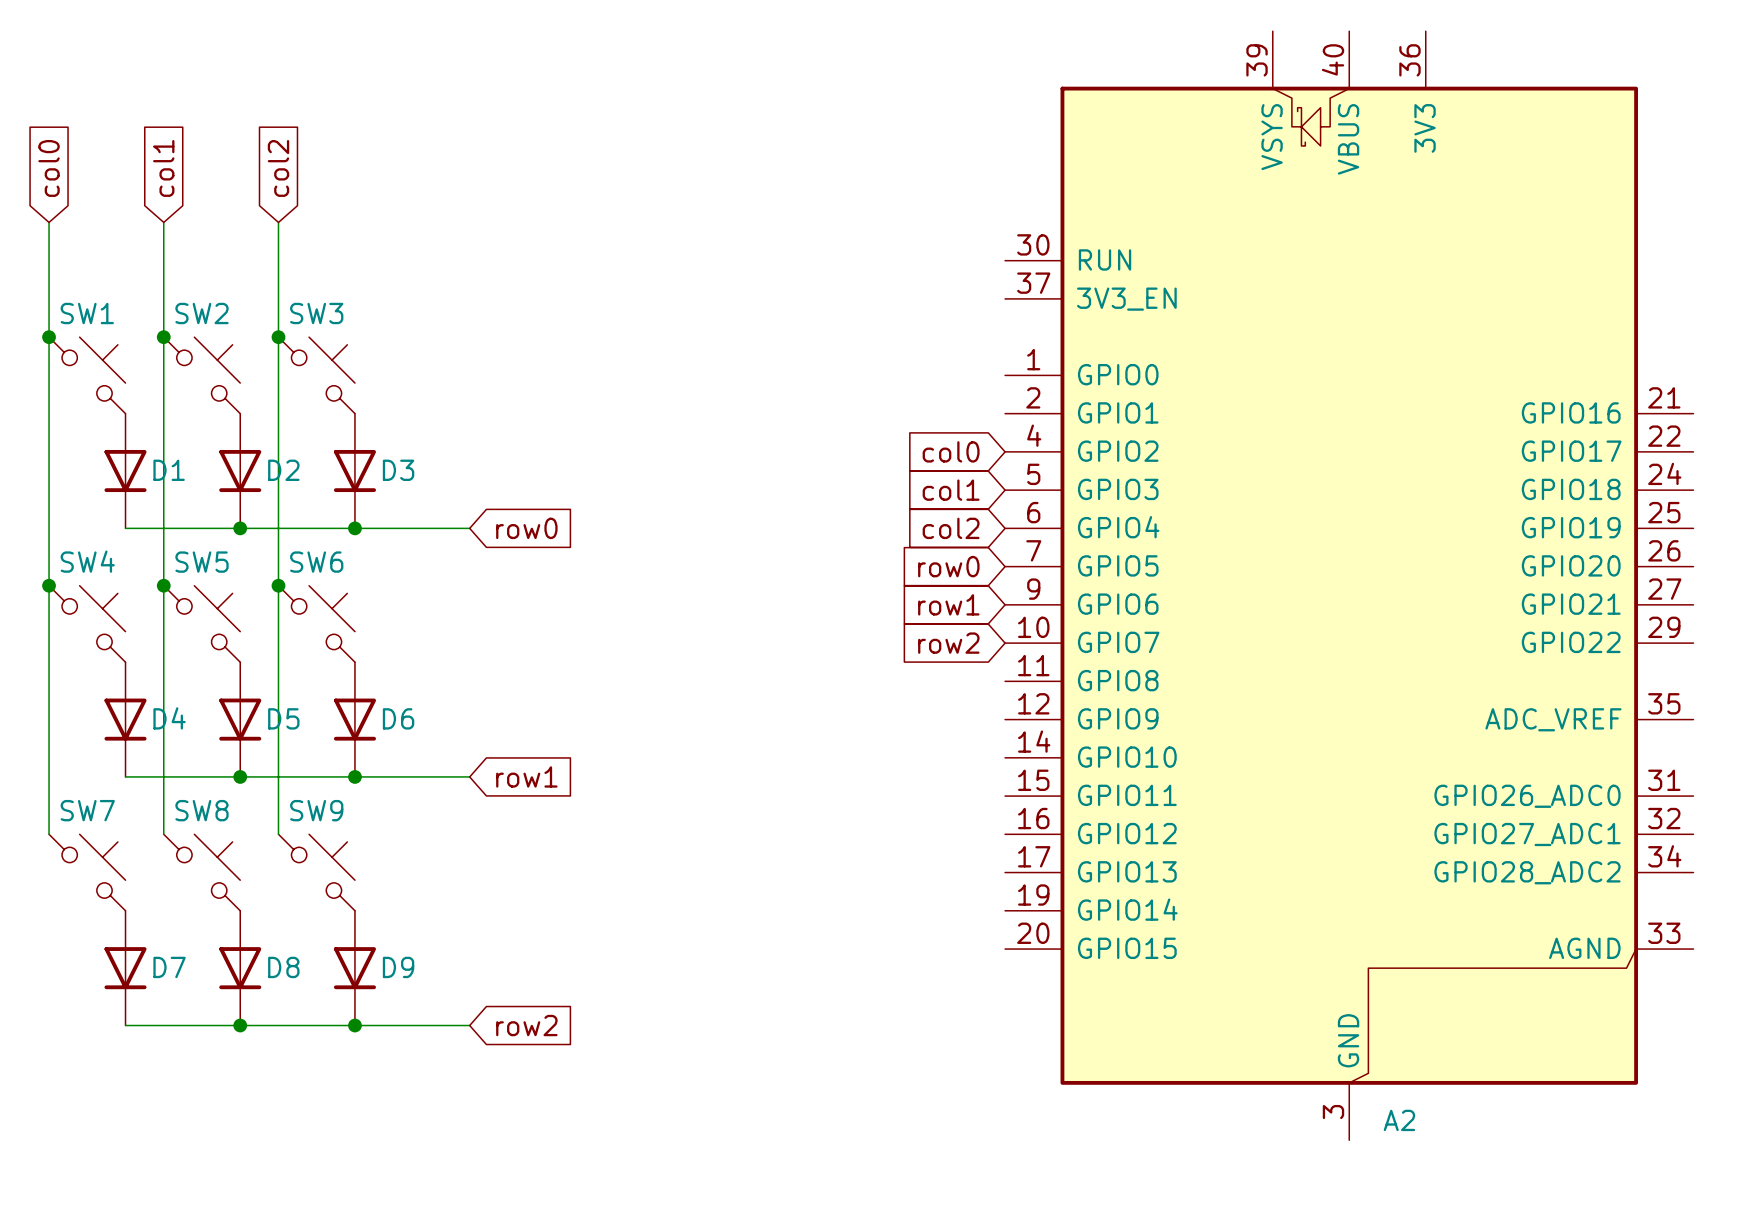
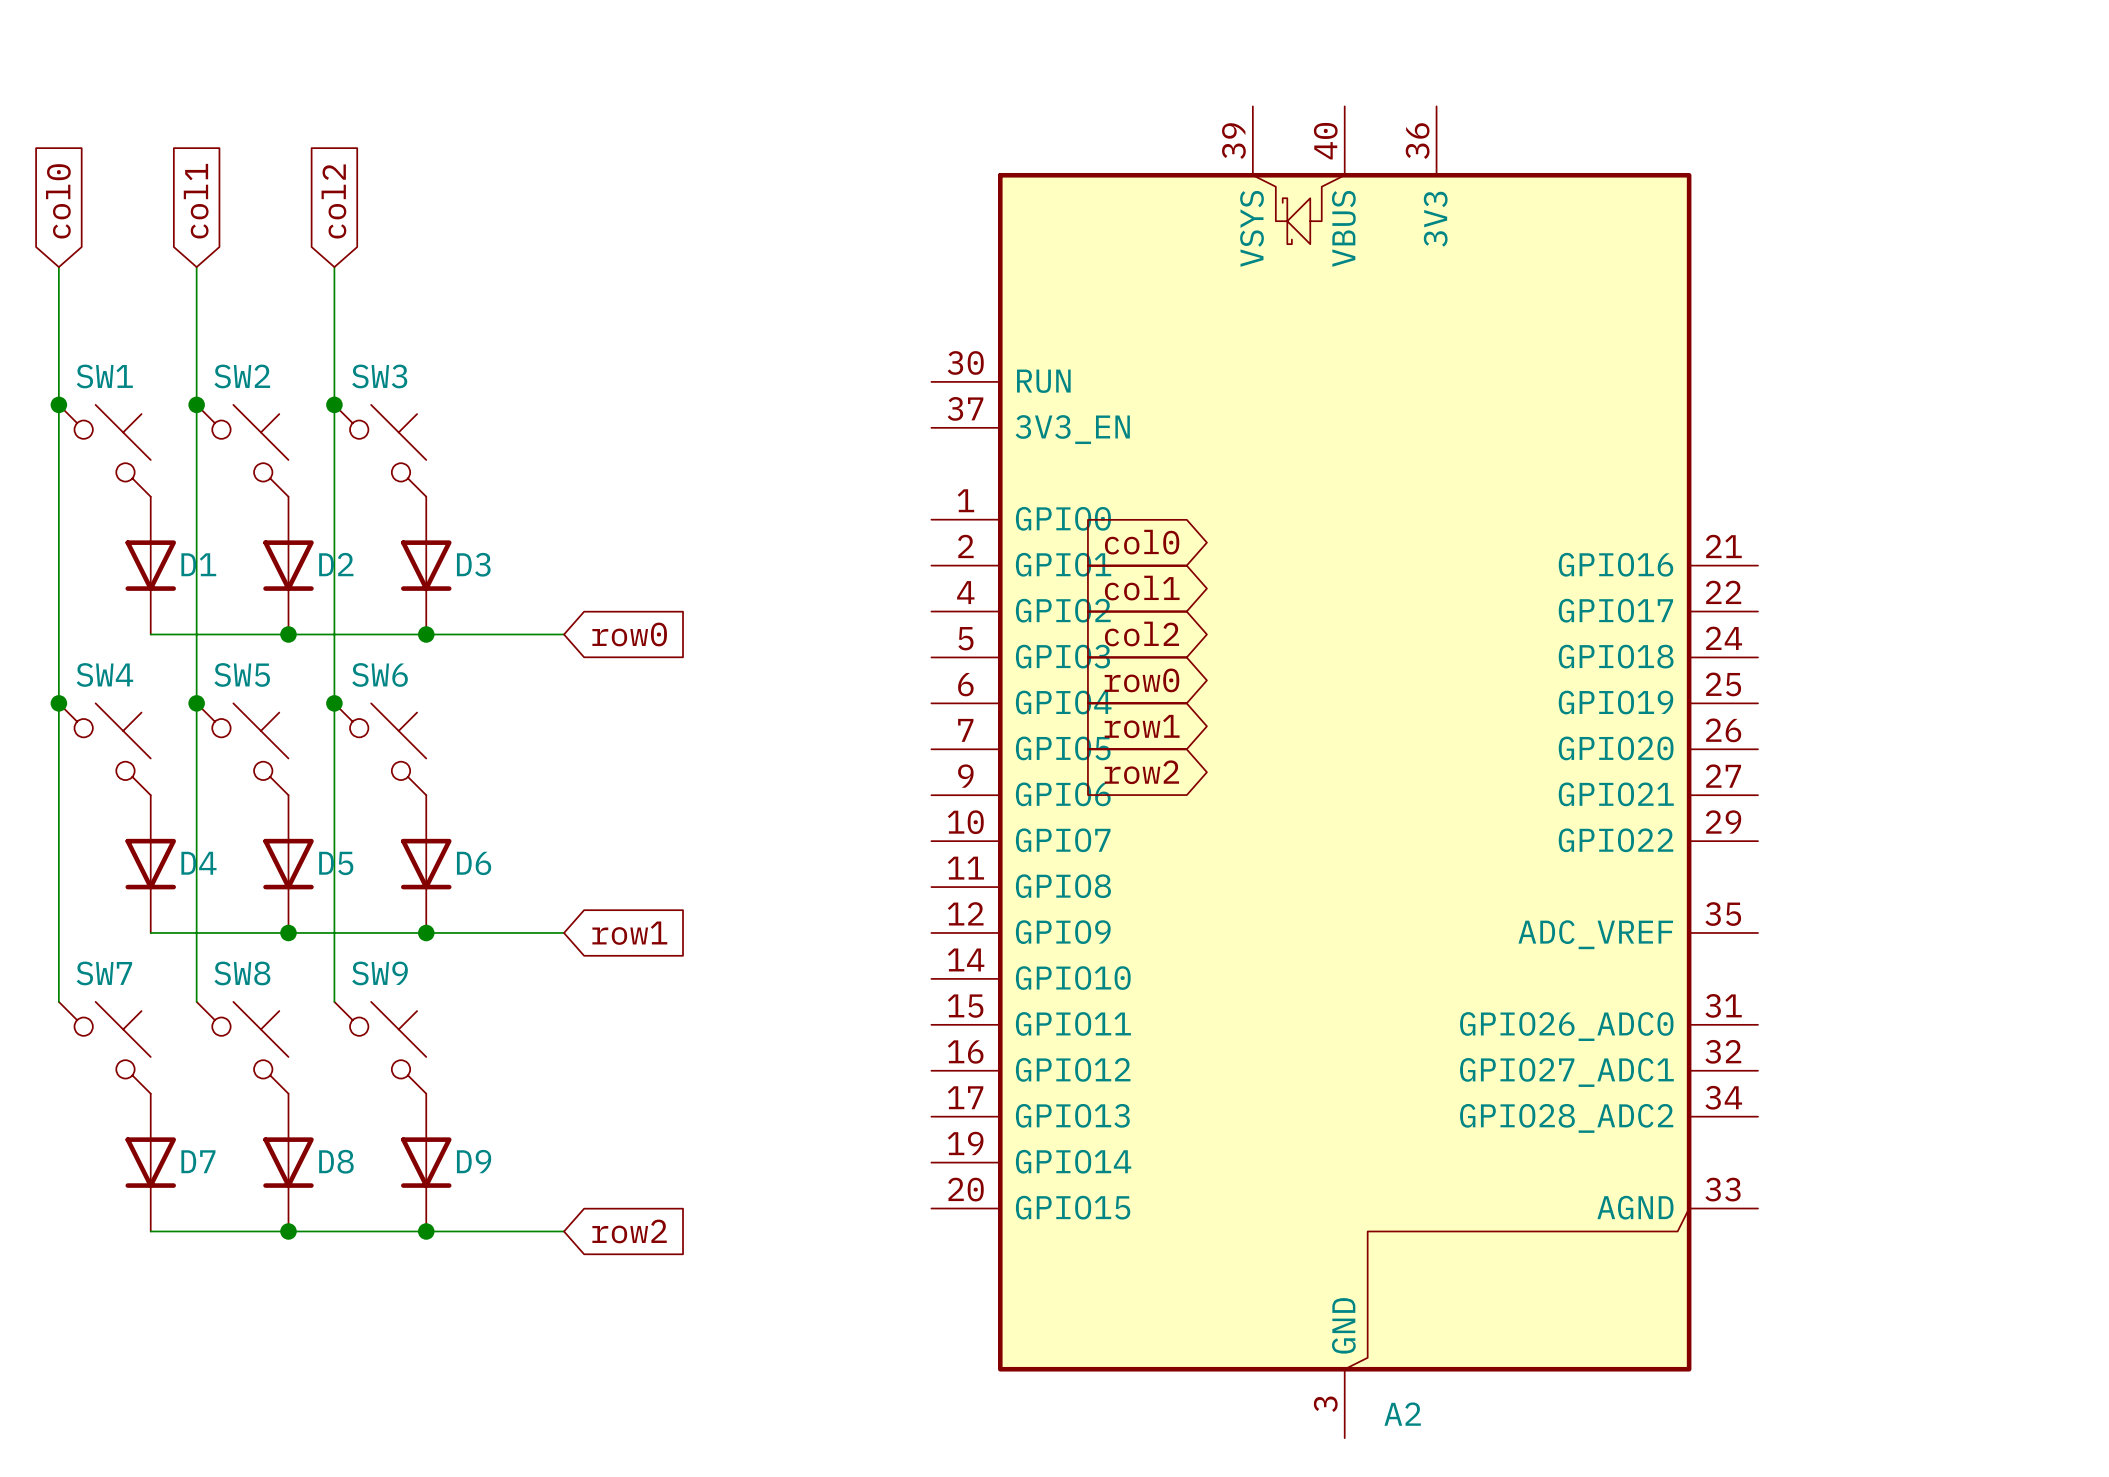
A2 position: (1349, 585) -> (1344, 772)

